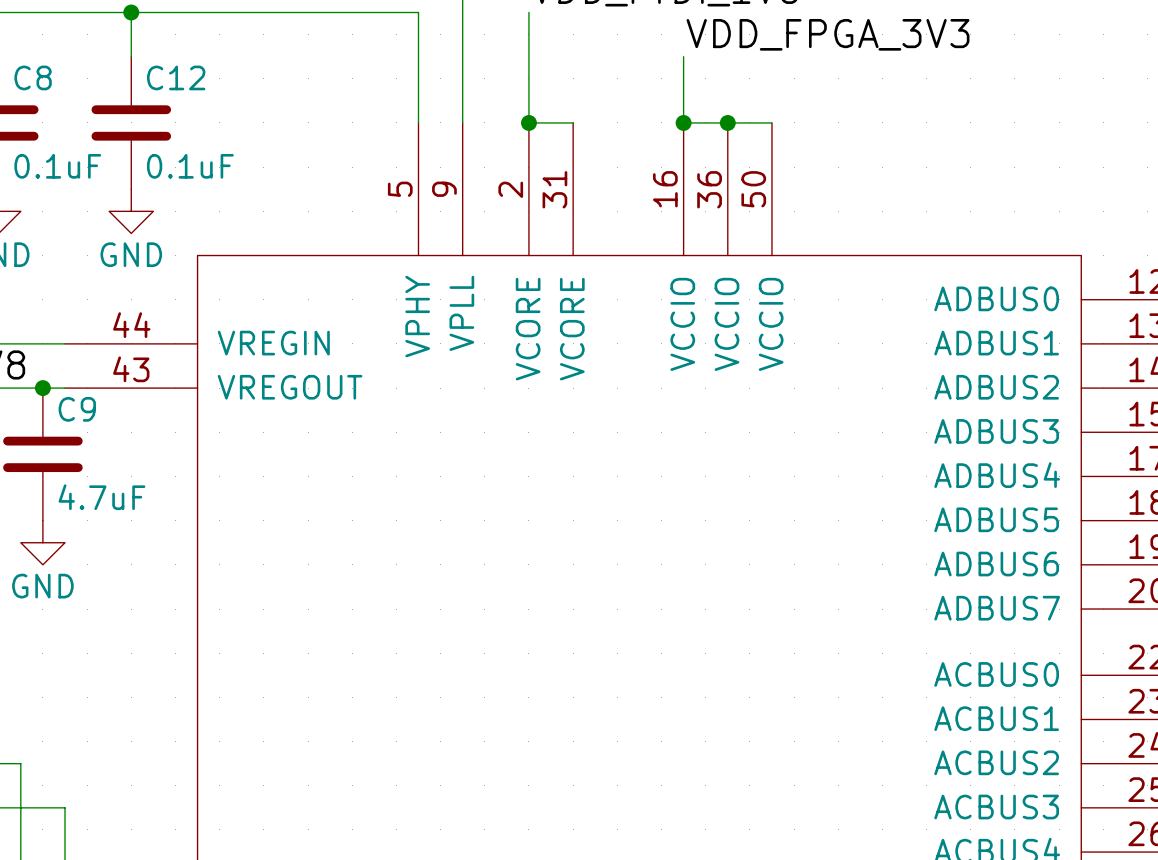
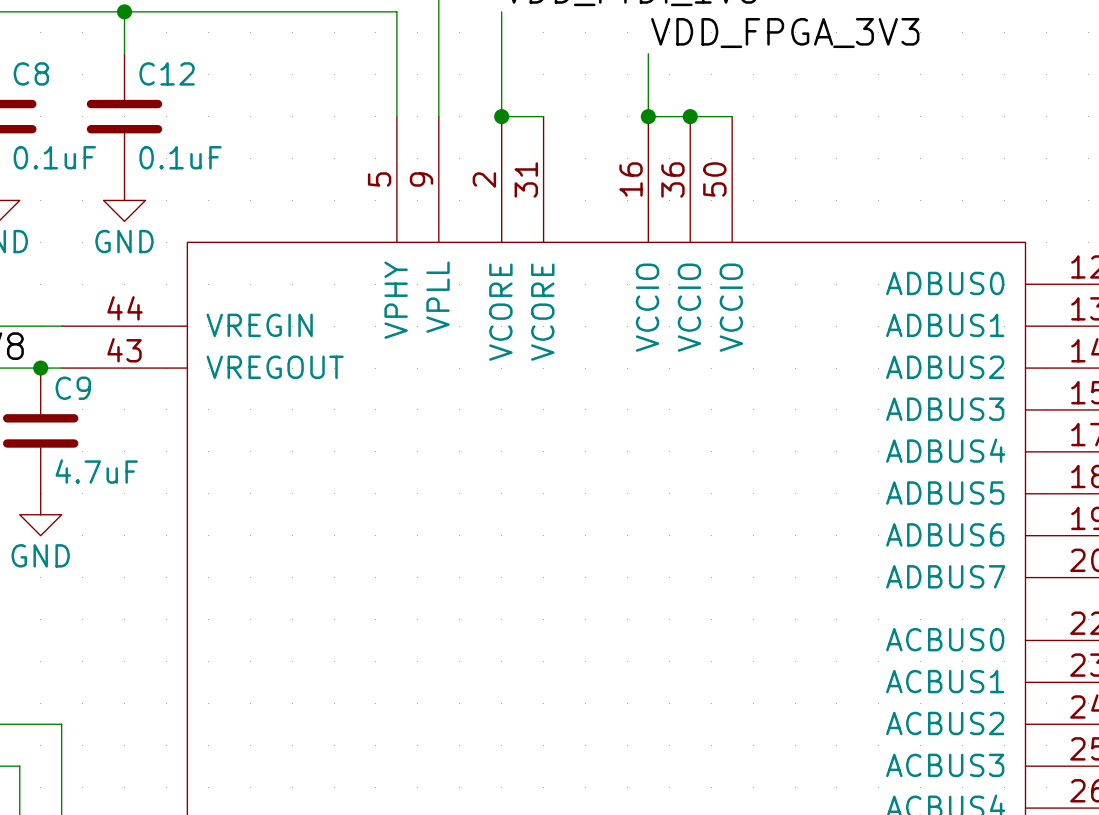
wire: (20, 763) (20, 807) (65, 807) -> (19, 724) (61, 724) (61, 766)

